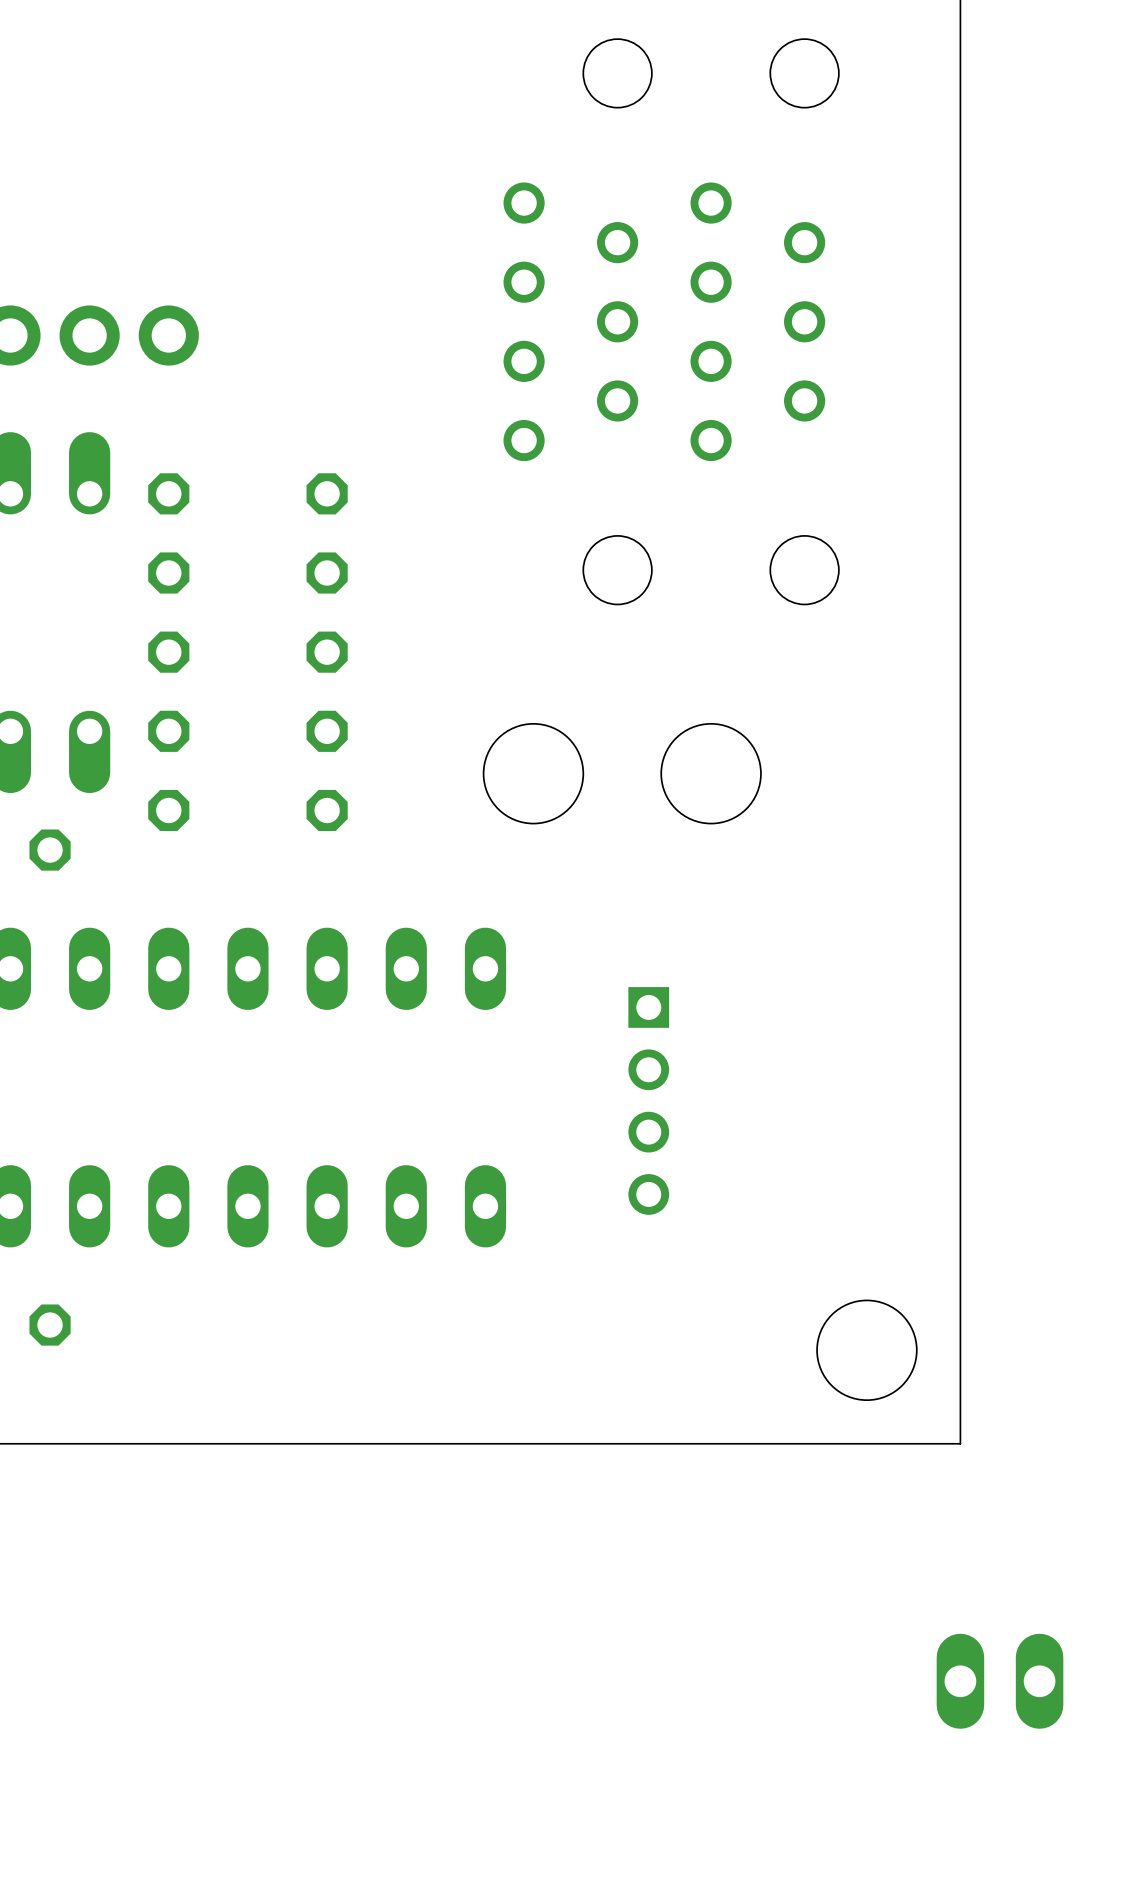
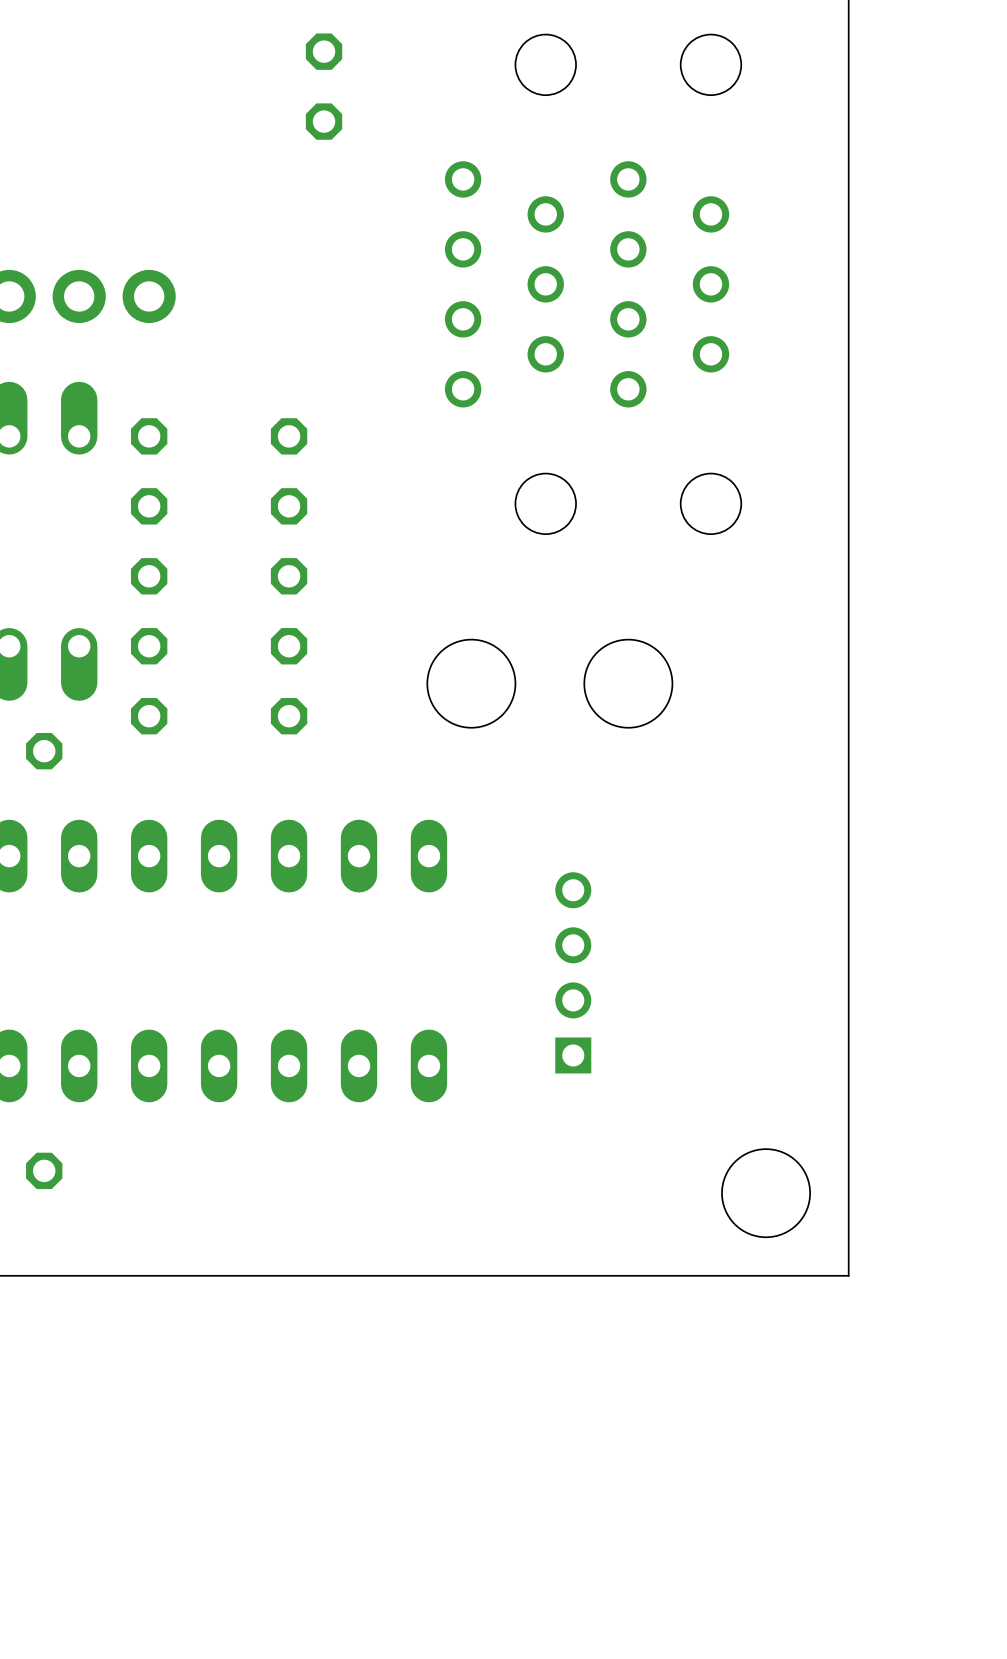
part: none -> (324, 86)
part rotation: 0° (648, 1100) -> 180° (573, 972)
part: (1000, 1681) -> none

